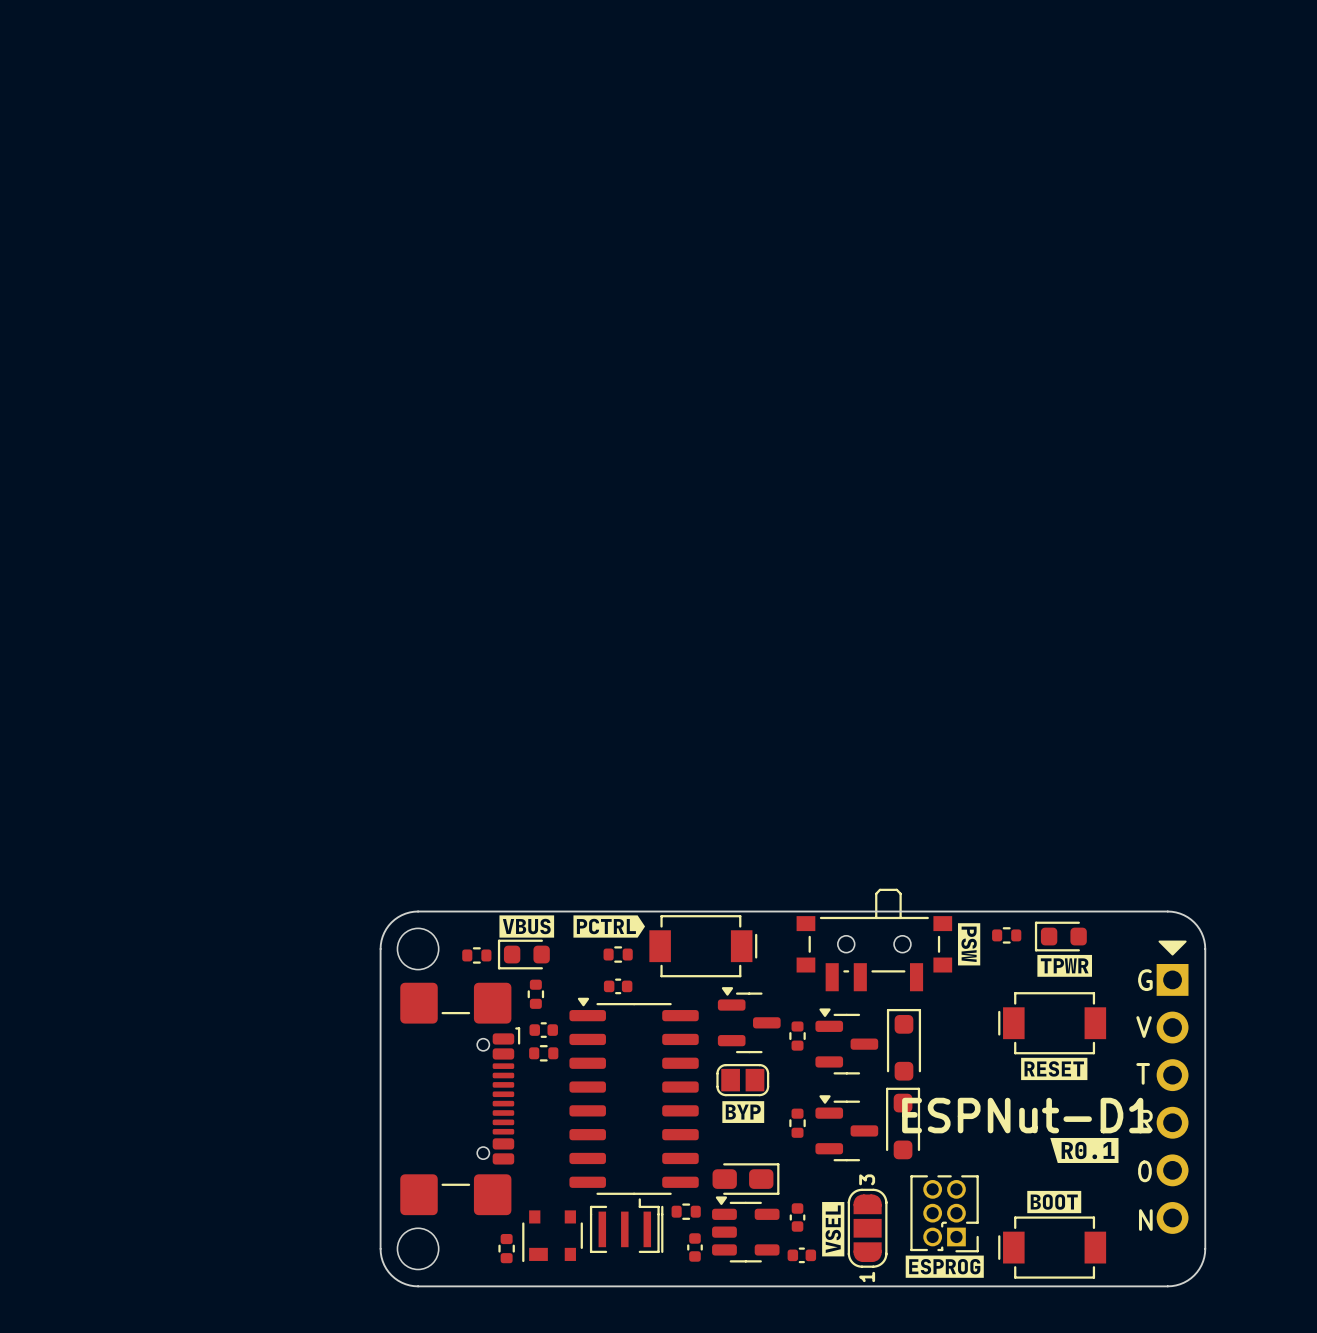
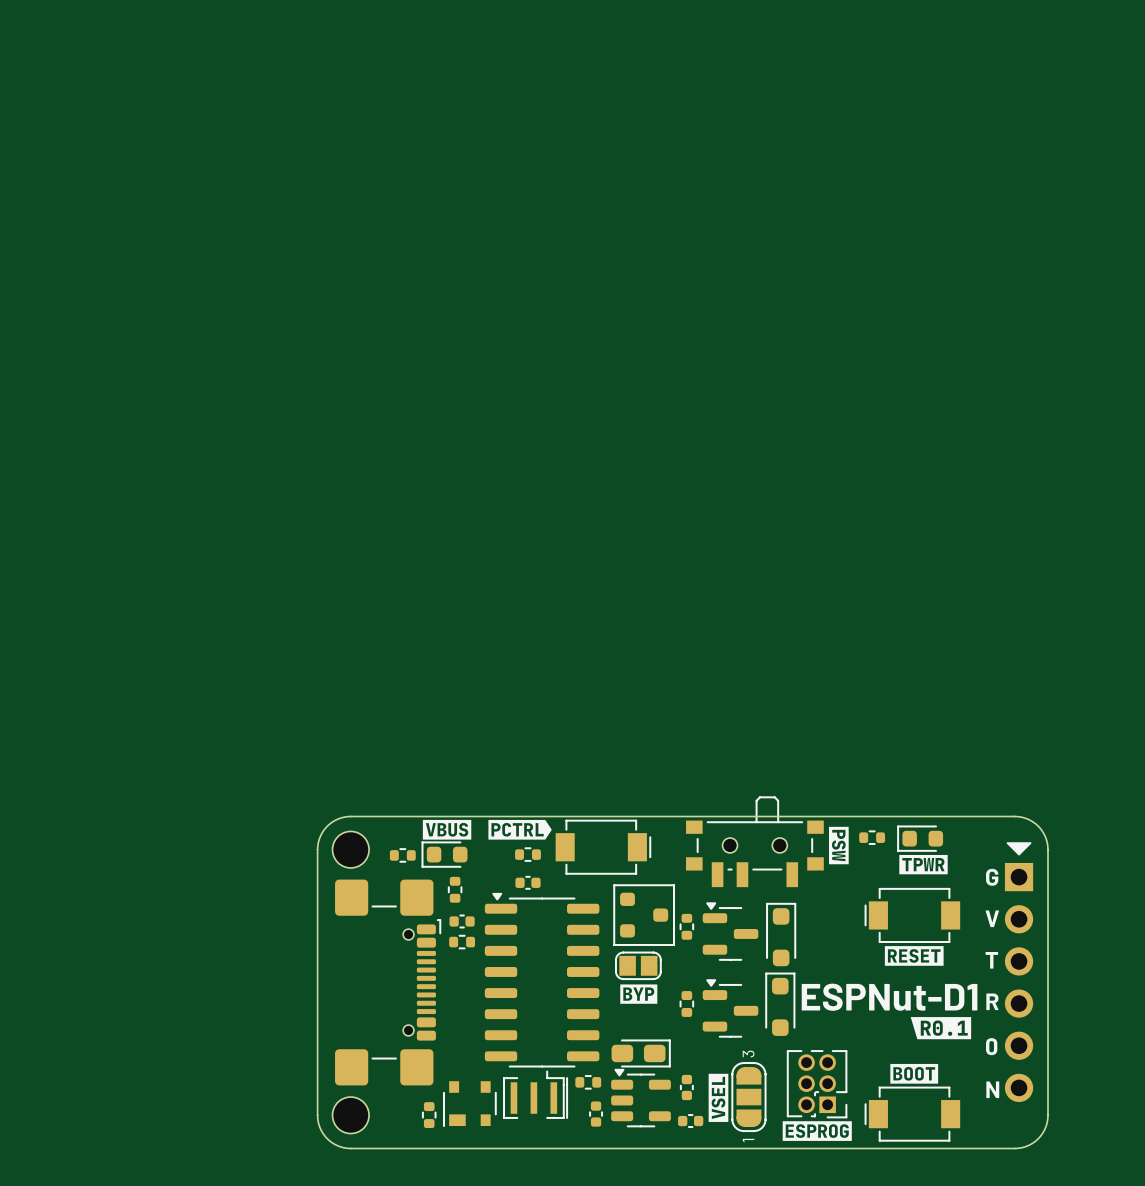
part footprint: [717, 987, 781, 1054] -> [613, 884, 675, 946]

